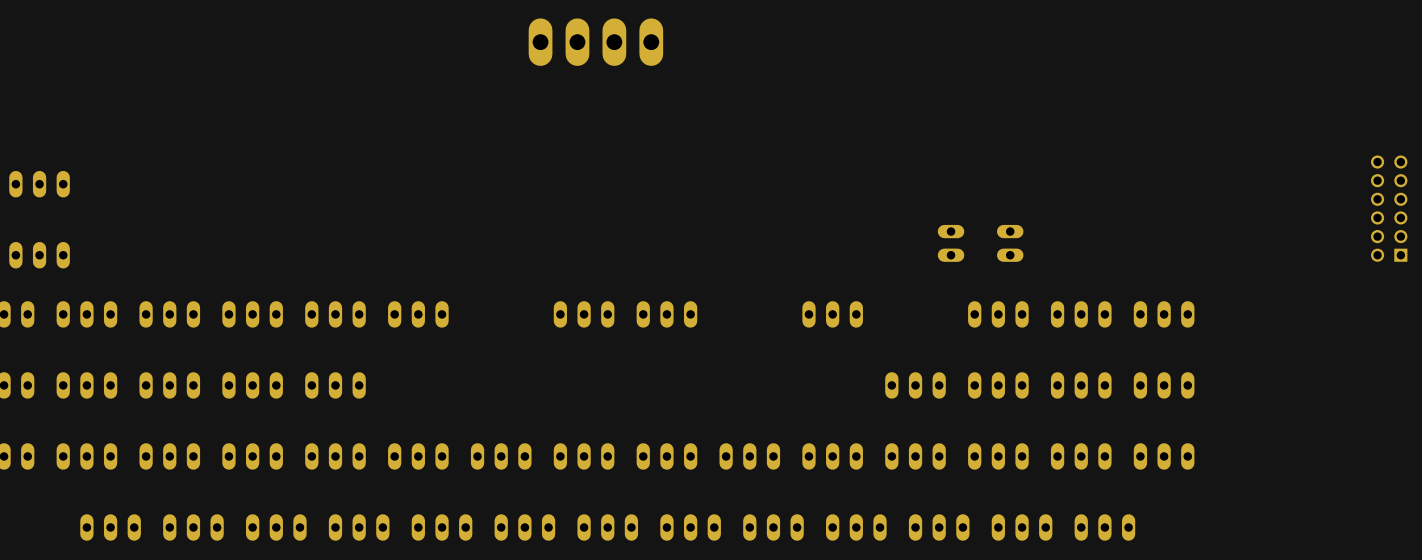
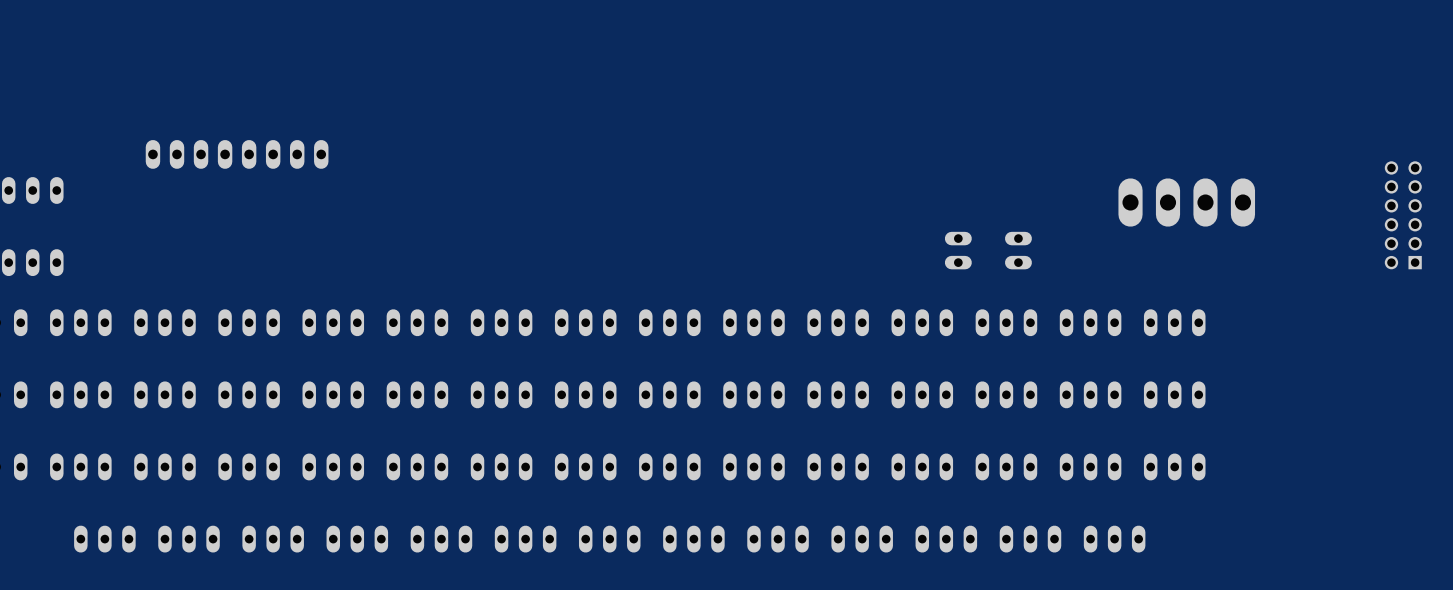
part: (595, 42) -> none
part: none -> (237, 154)
part: none -> (1186, 202)
part: none -> (501, 322)
part: none -> (753, 322)
part: none -> (922, 322)
part: none -> (417, 394)
part: none -> (501, 394)
part: none -> (585, 394)
part: none -> (669, 394)
part: none -> (753, 394)
part: none -> (838, 394)

